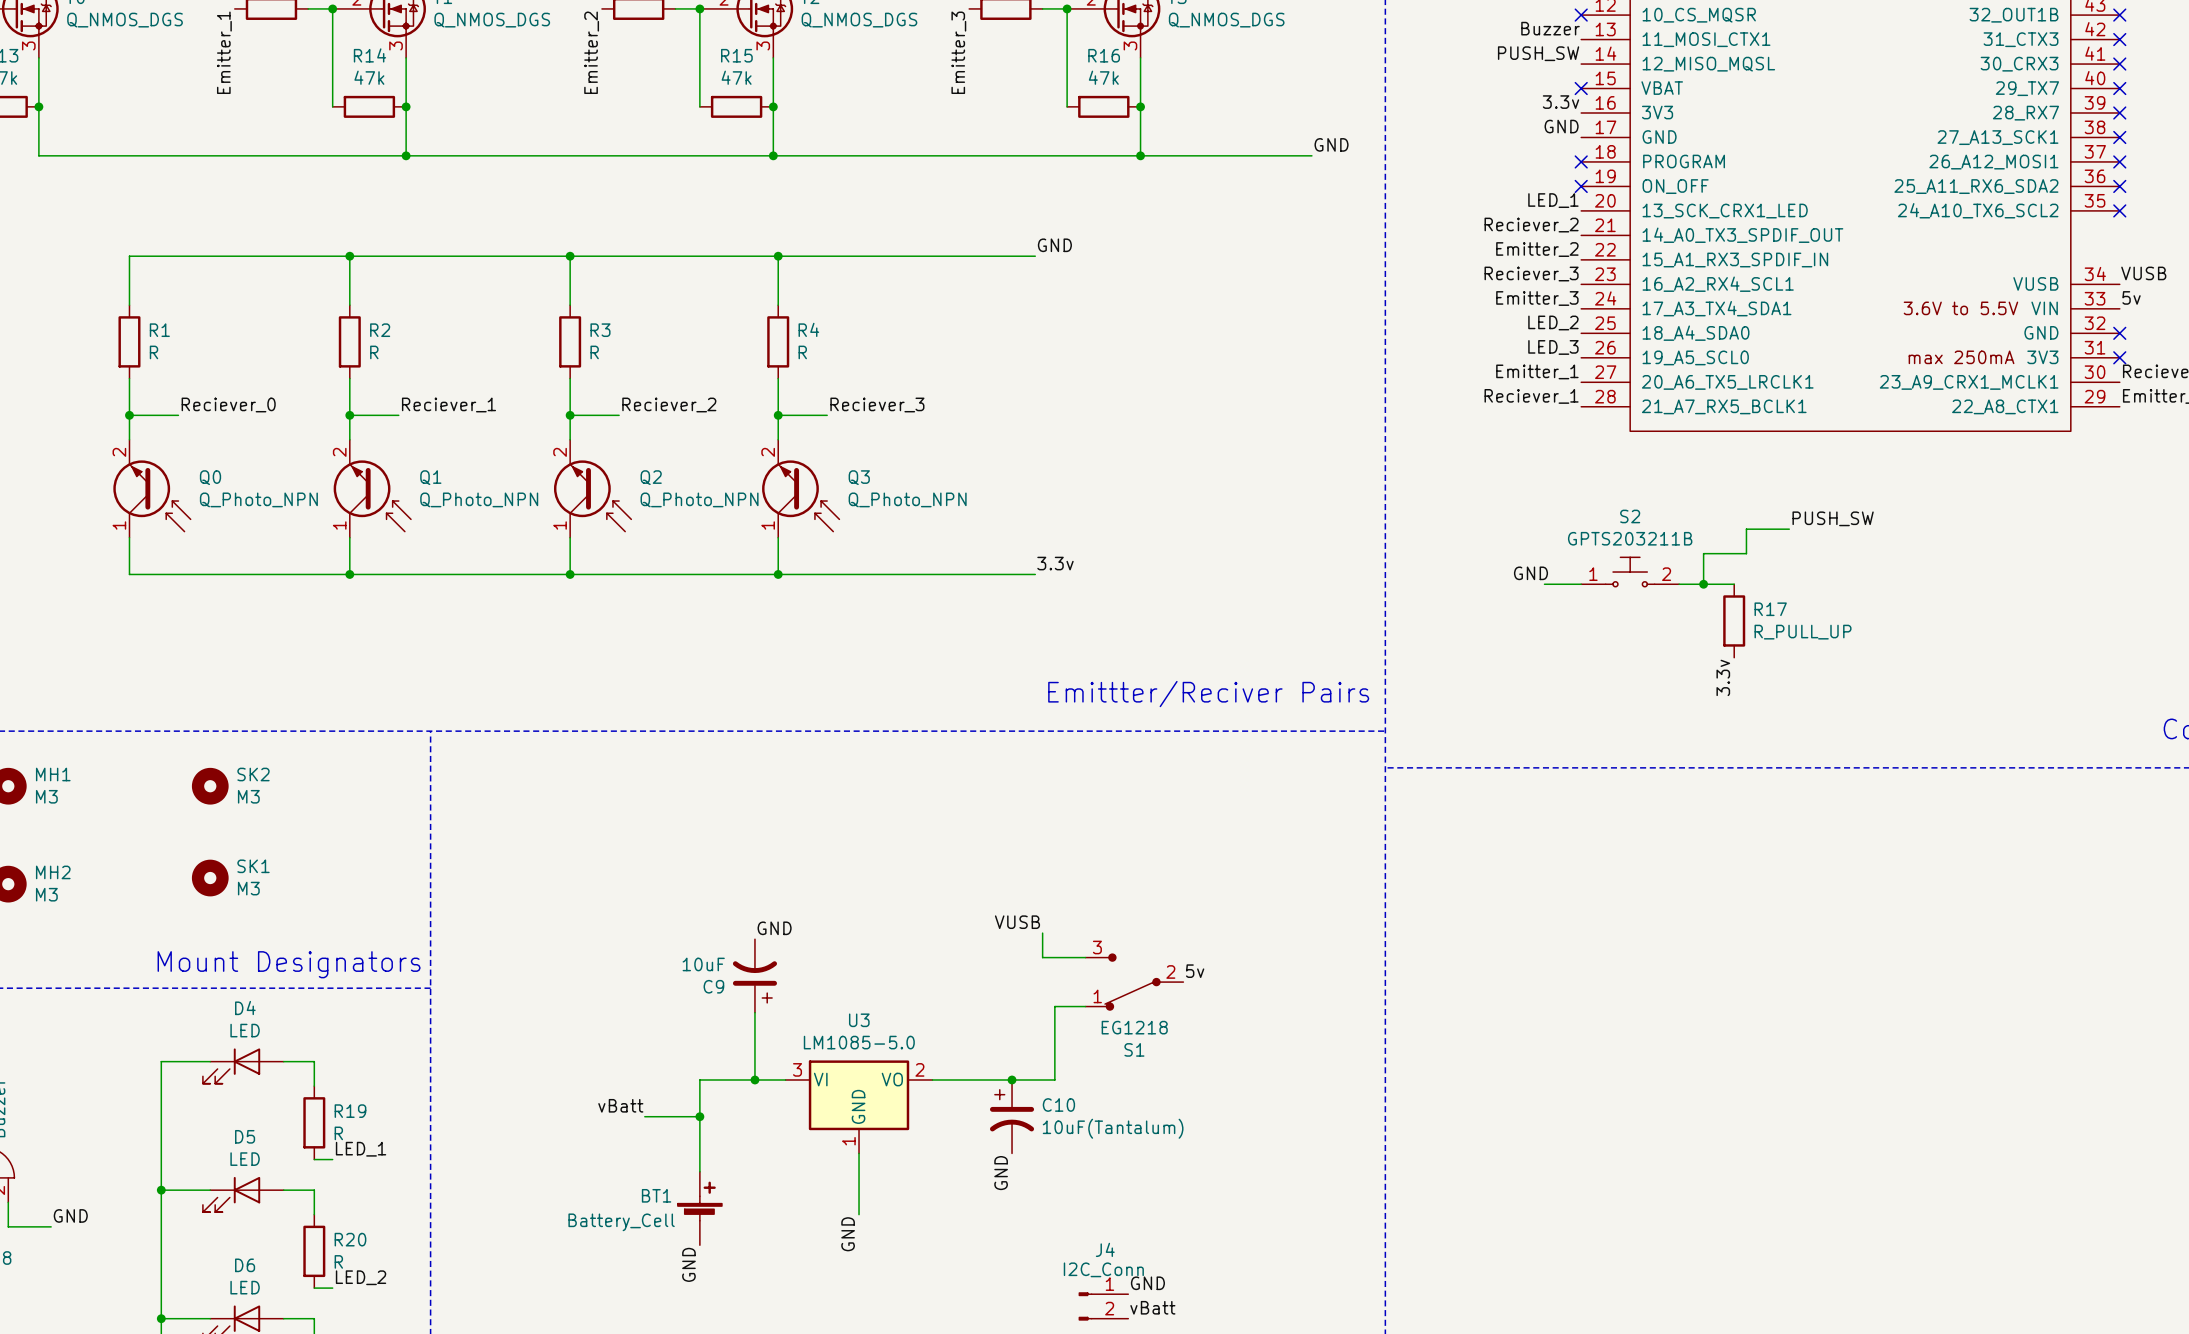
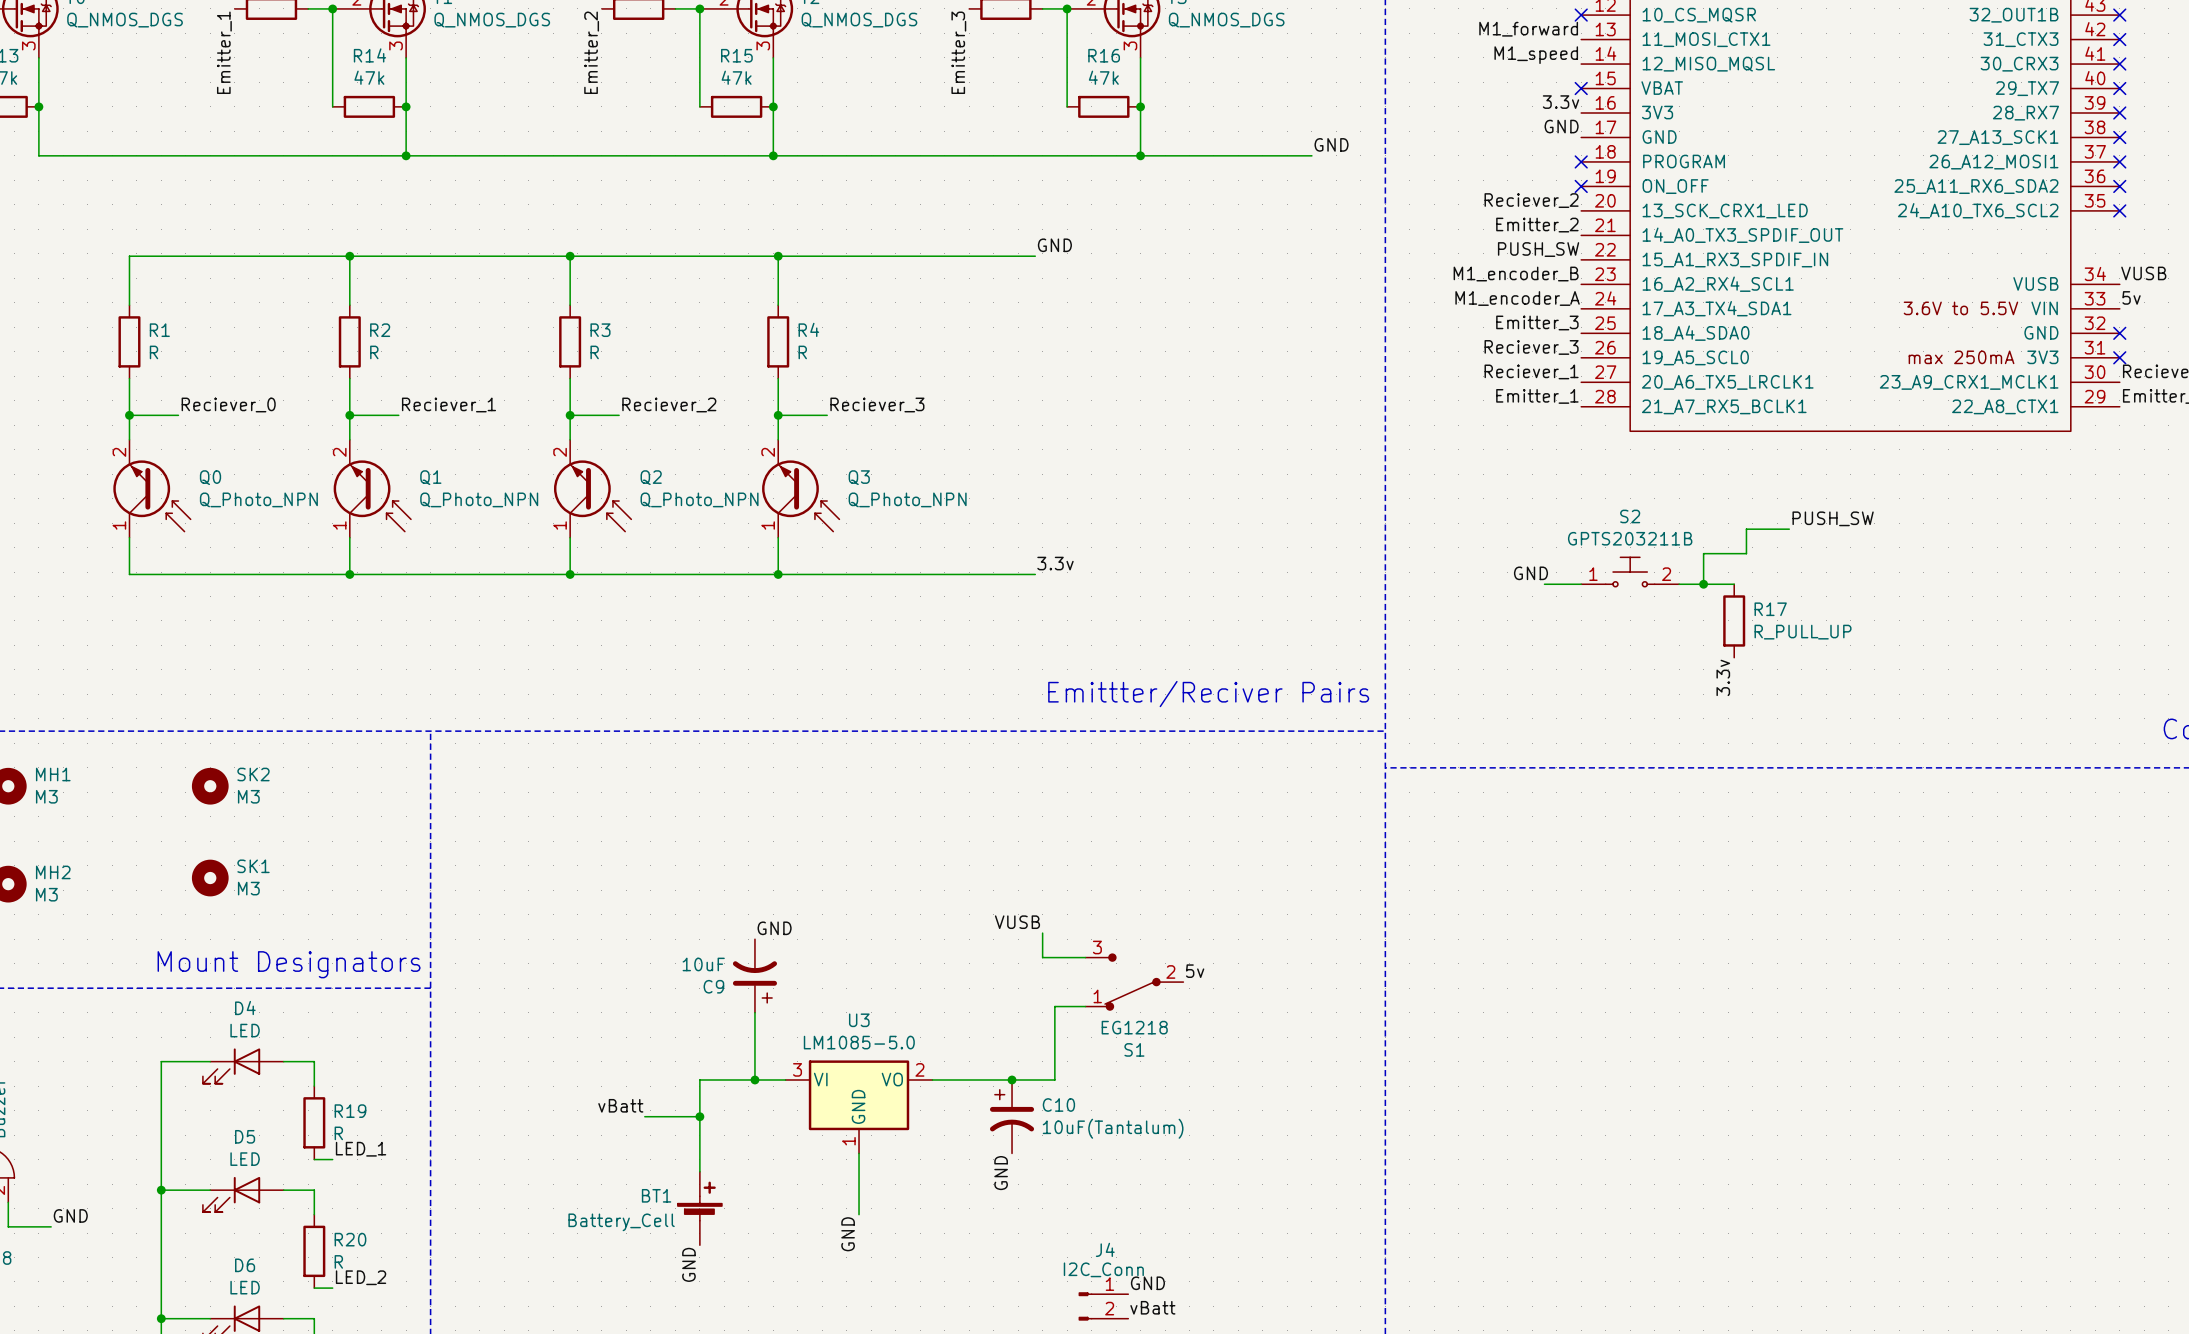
label: Buzzer (1550, 28) -> M1_forward (1528, 29)
label: PUSH_SW (1538, 53) -> M1_speed (1536, 55)
label: LED_1 (1553, 200) -> Reciever_2 (1531, 200)
label: Reciever_2 (1531, 225) -> Emitter_2 (1537, 225)
label: Emitter_2 (1537, 249) -> PUSH_SW (1538, 249)
label: Reciever_3 (1531, 274) -> M1_encoder_B (1516, 274)
label: Emitter_3 (1537, 298) -> M1_encoder_A (1517, 298)
label: LED_2 (1553, 322) -> Emitter_3 (1537, 322)
label: LED_3 (1553, 347) -> Reciever_3 (1531, 347)
label: Emitter_1 (1537, 371) -> Reciever_1 (1531, 371)
label: Reciever_1 (1531, 396) -> Emitter_1 (1537, 396)

